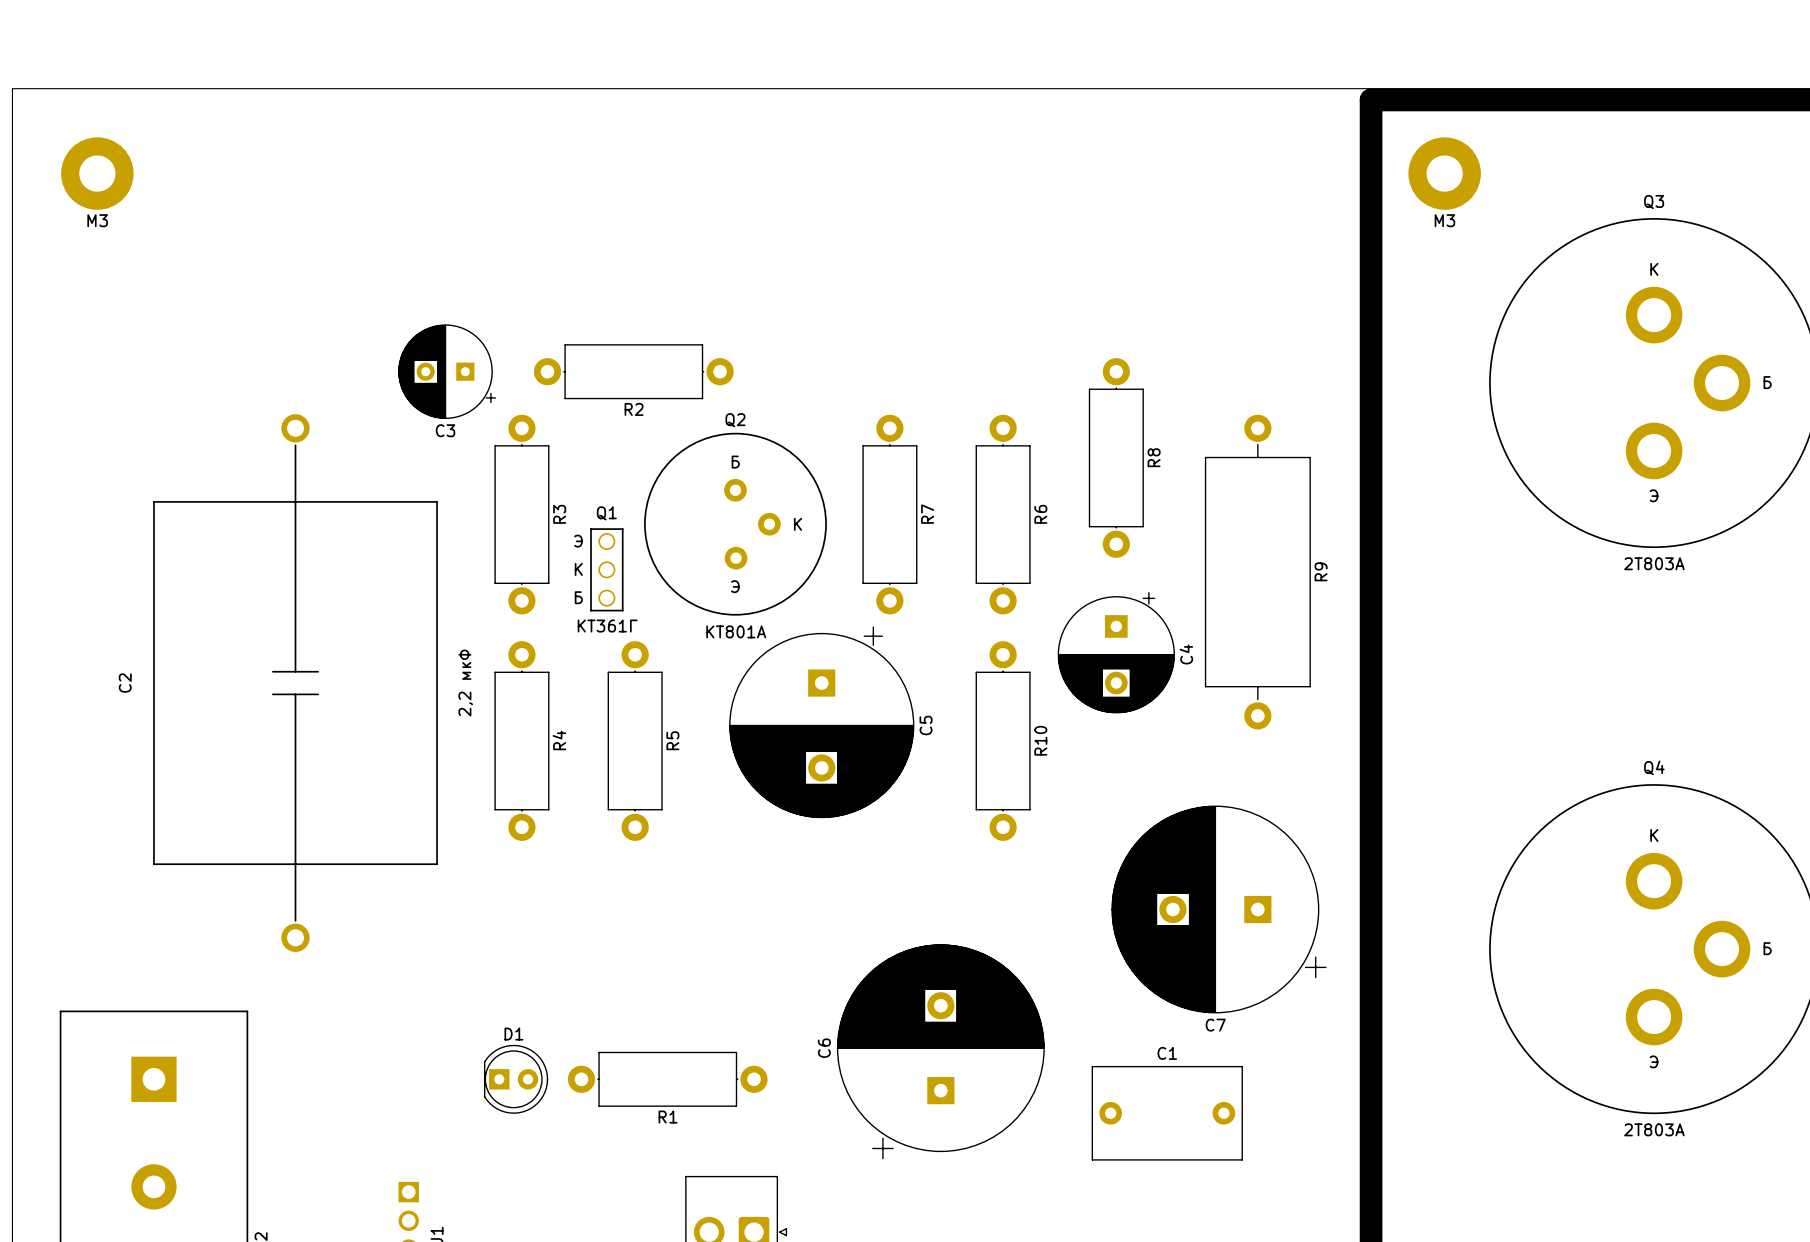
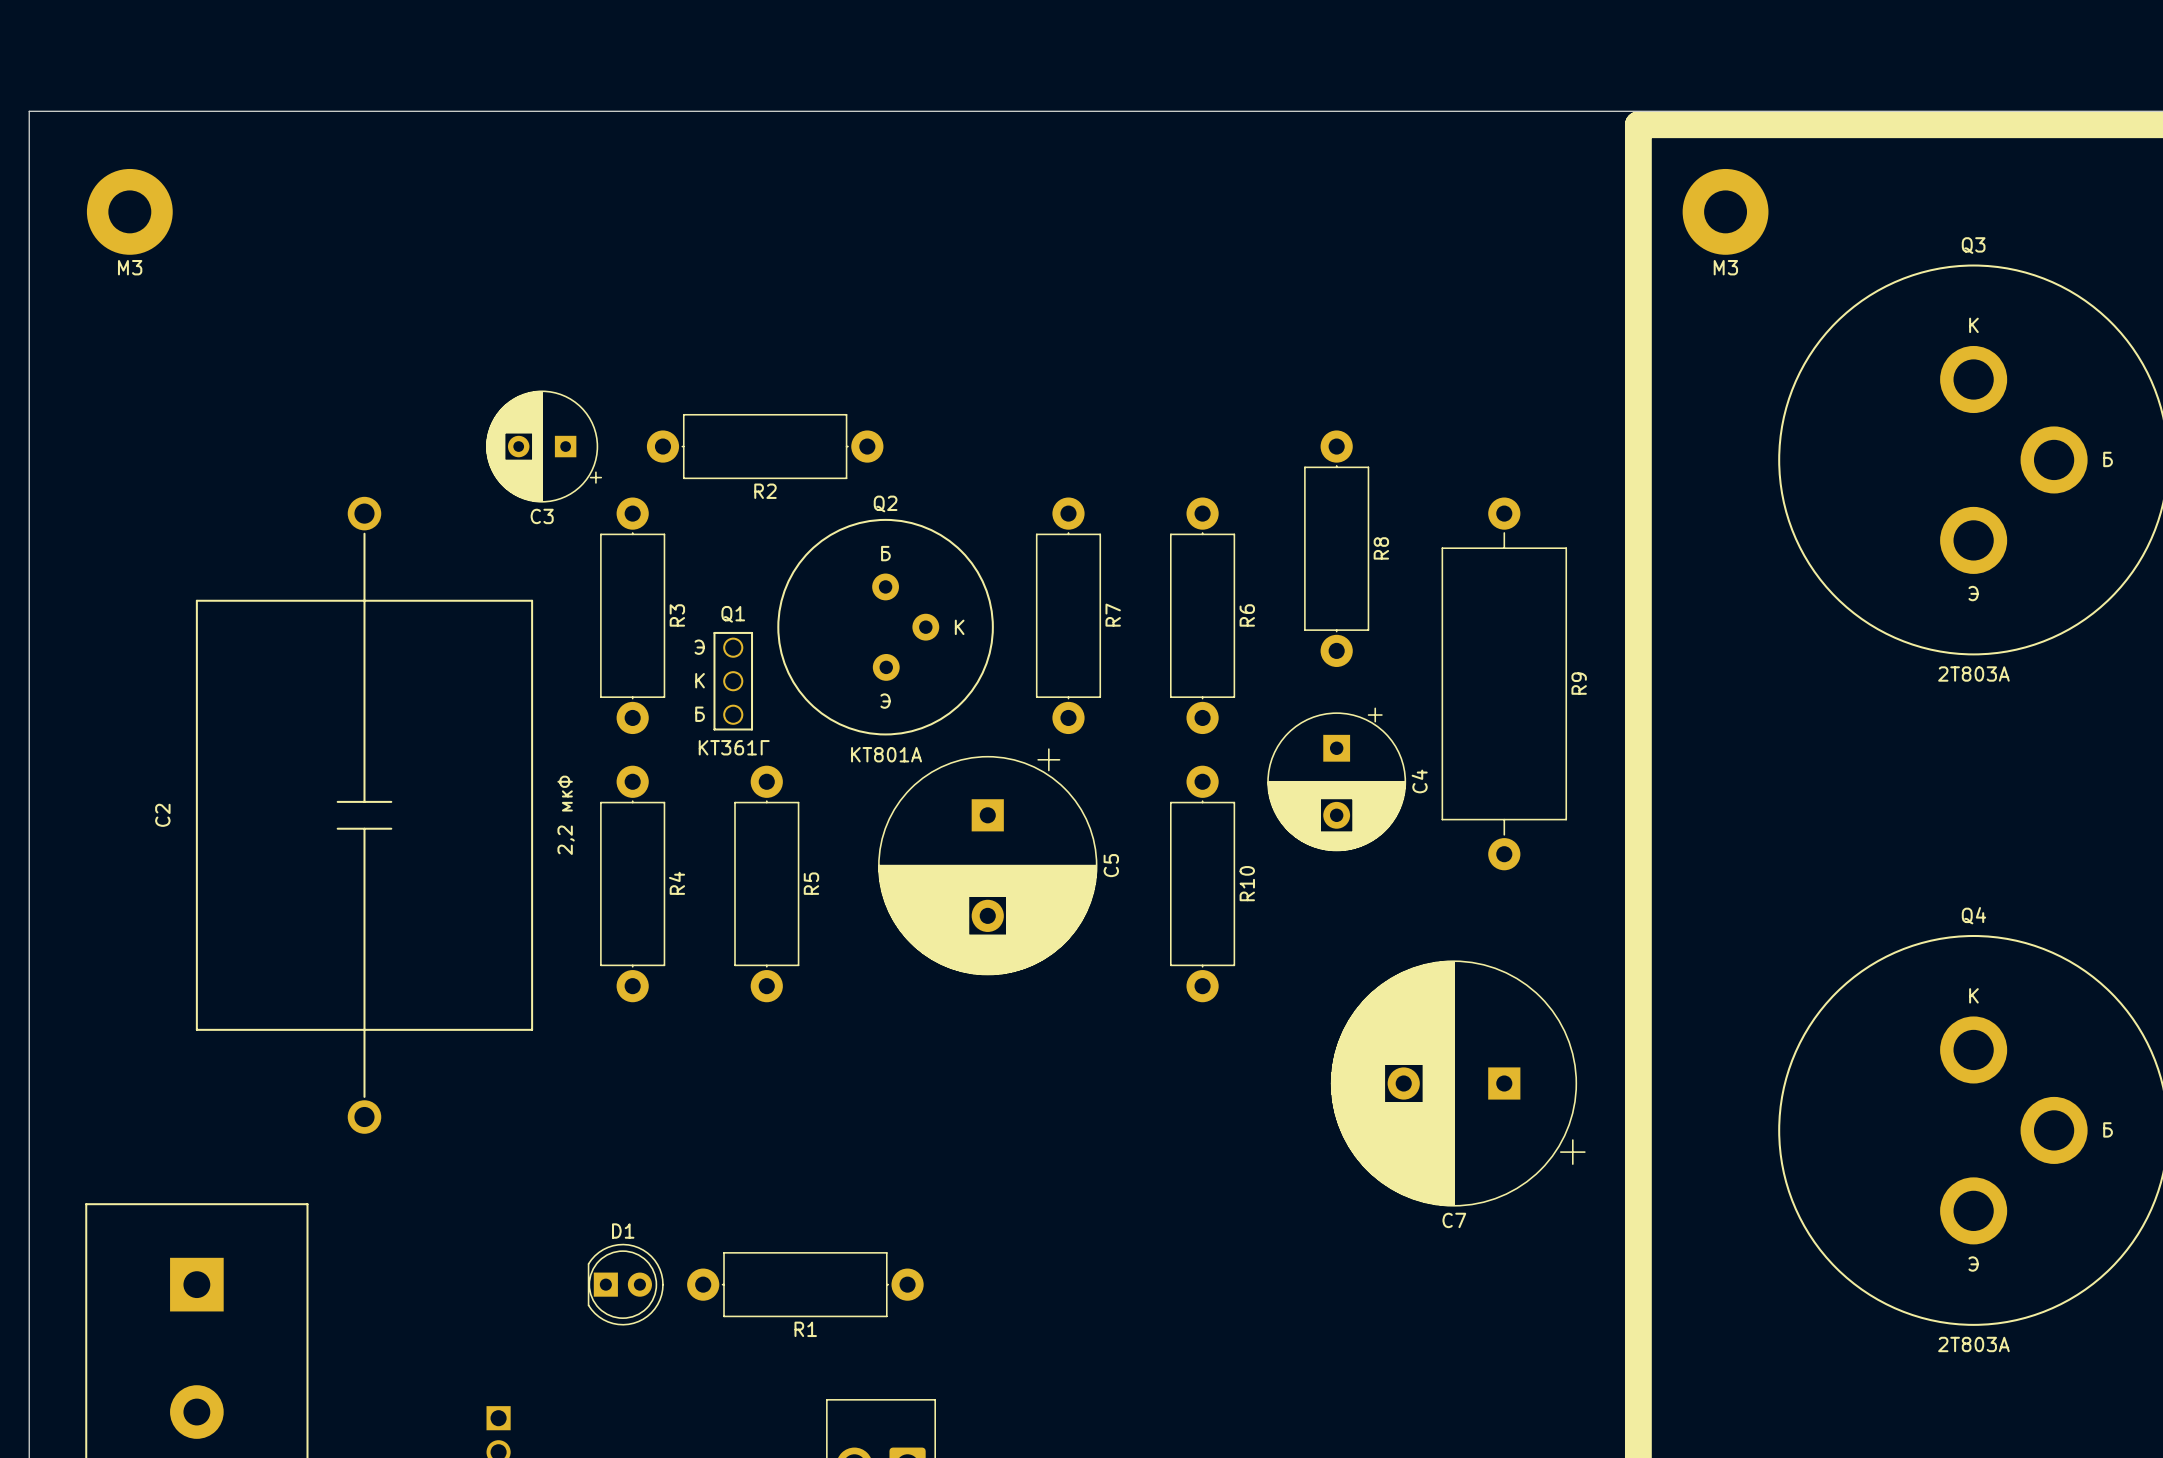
C6: (940, 1051) -> none
C1: (1167, 1113) -> none

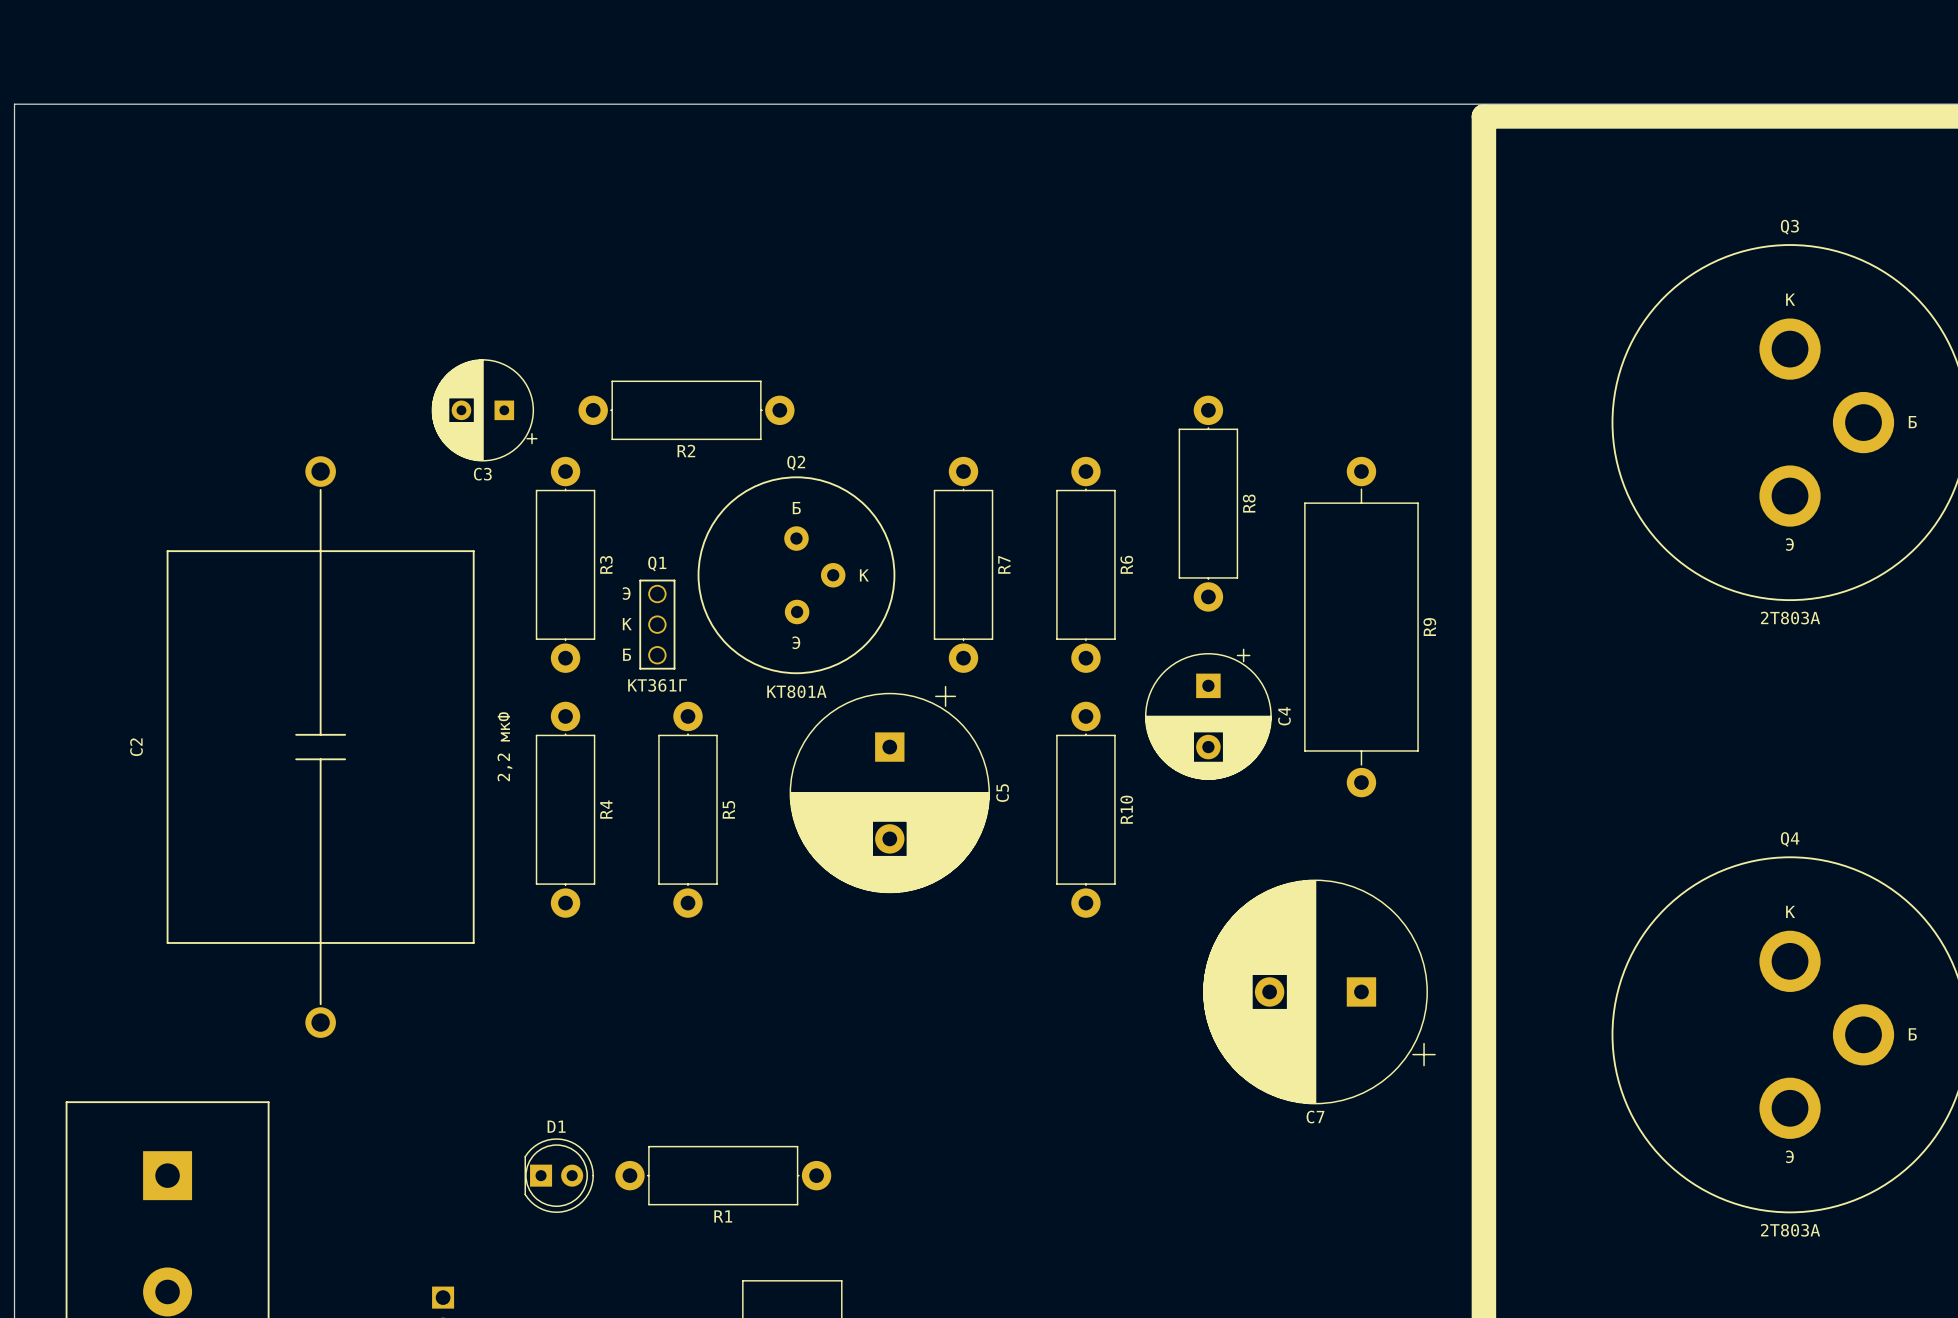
part: M3 (129, 211) -> none
part: M3 (1725, 211) -> none

